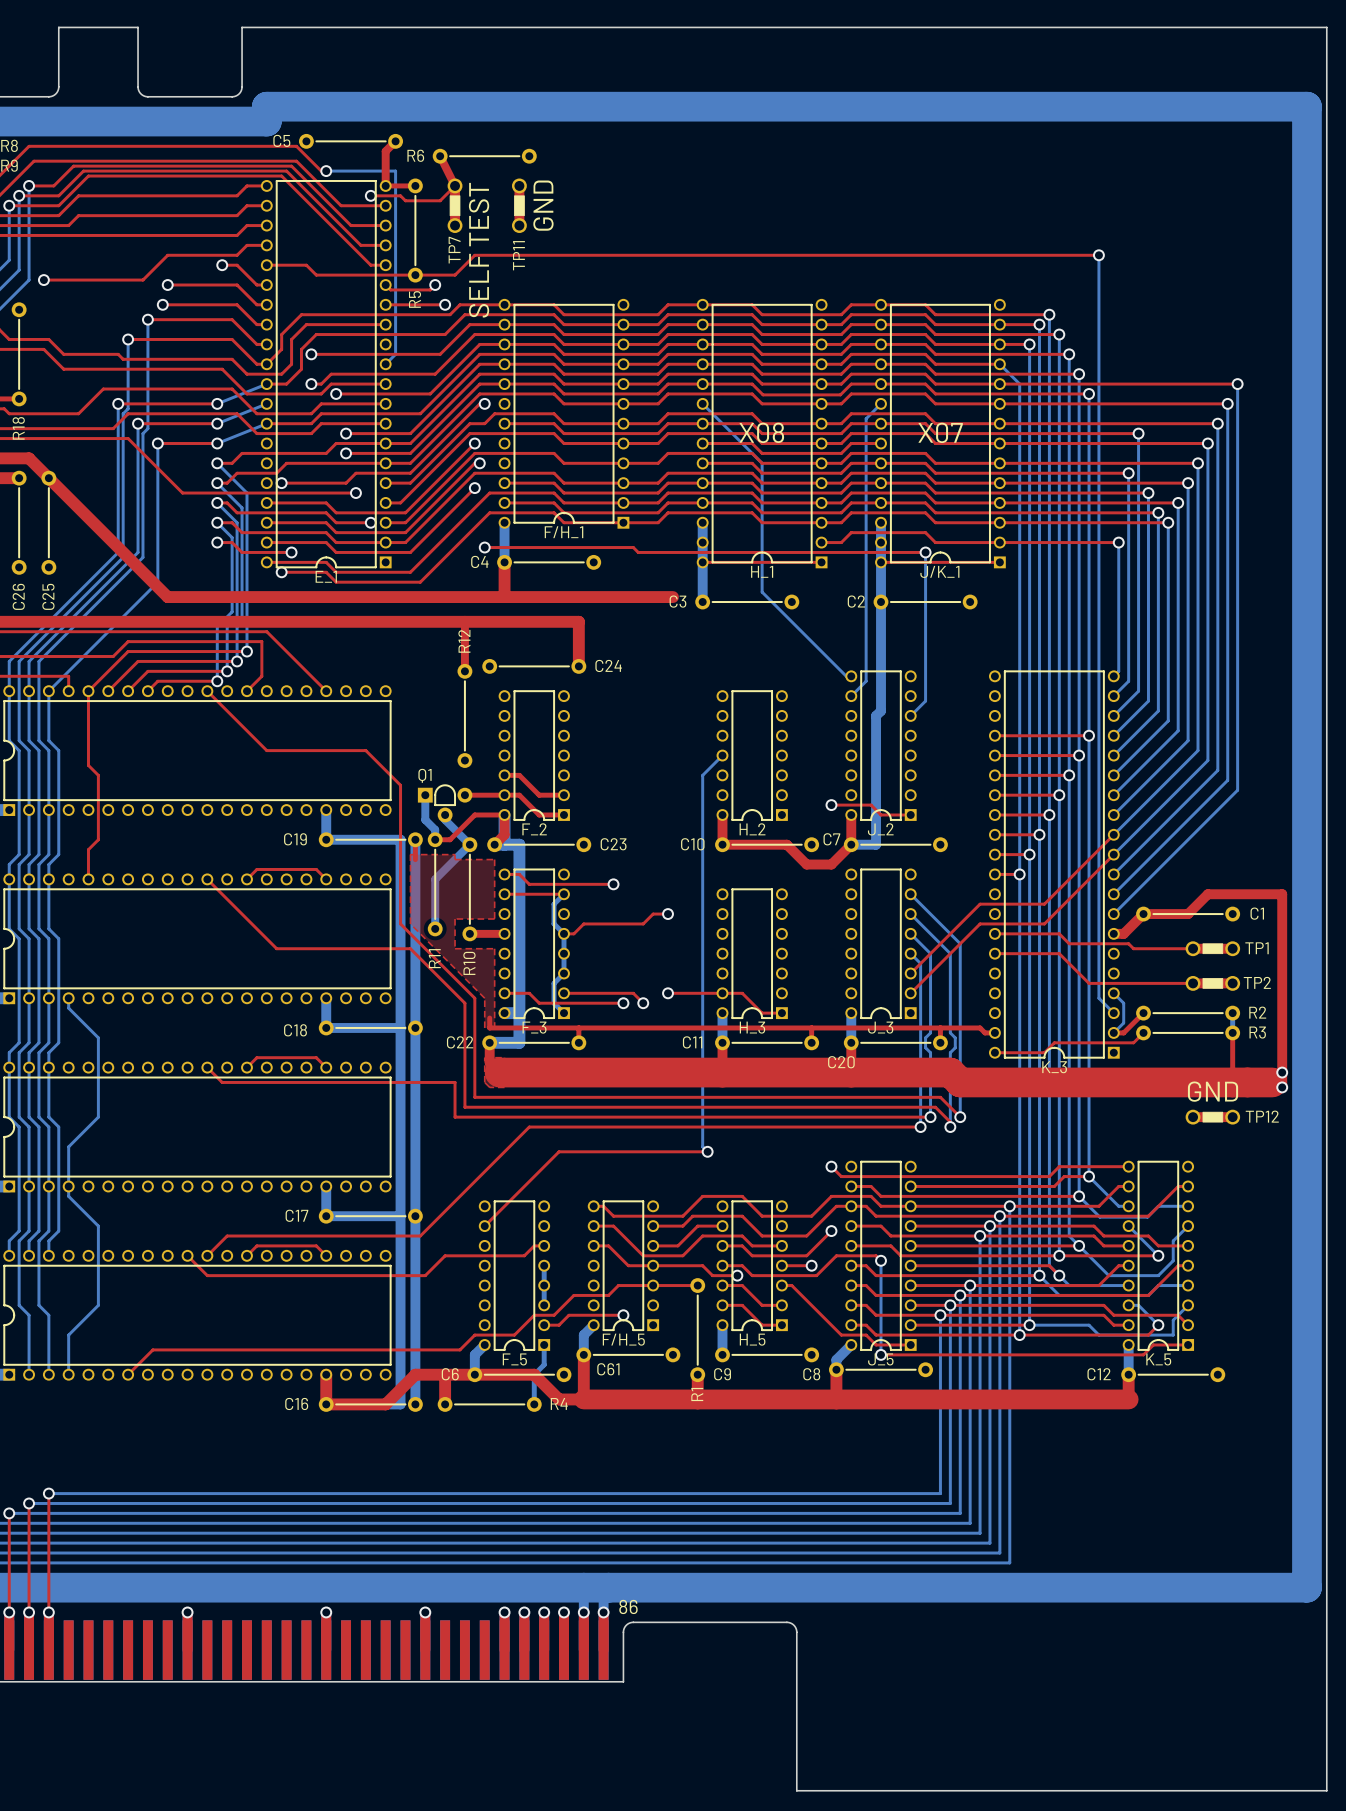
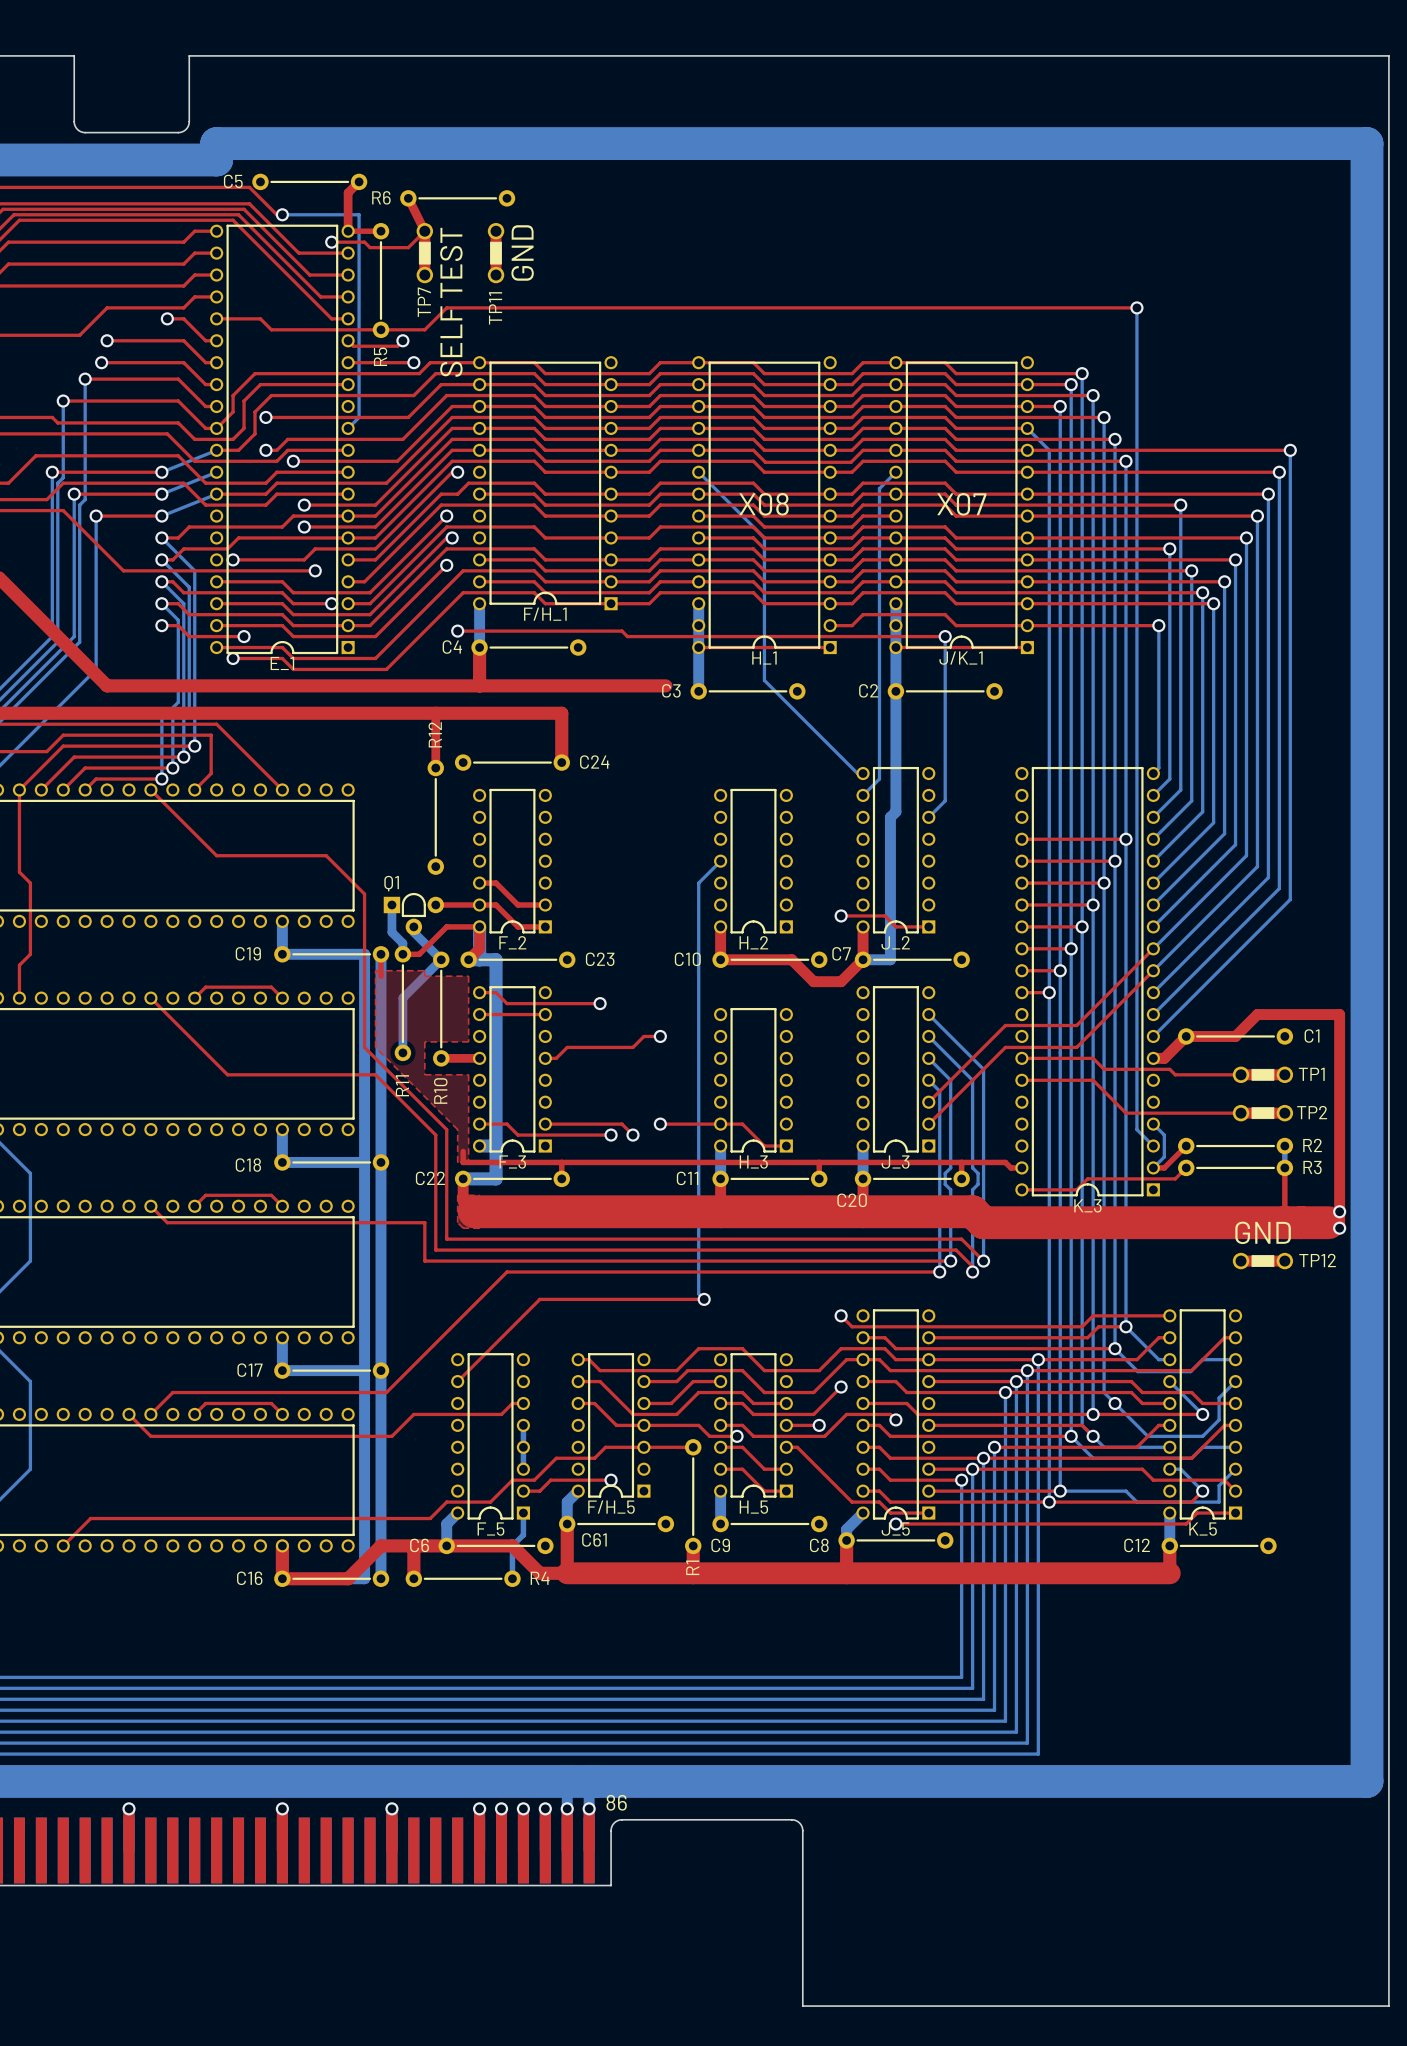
bottom track: (564, 894) (554, 904) (554, 923) (564, 933) (564, 973) (554, 983) (554, 1003) (564, 1013) -> none
top track: (910, 1245) (1079, 1245) -> none
bottom track: (881, 1260) (881, 1354) -> none
top track: (910, 1285) (970, 1285) -> none
top track: (940, 1315) (1103, 1315) (1113, 1325) (1128, 1325) -> none

